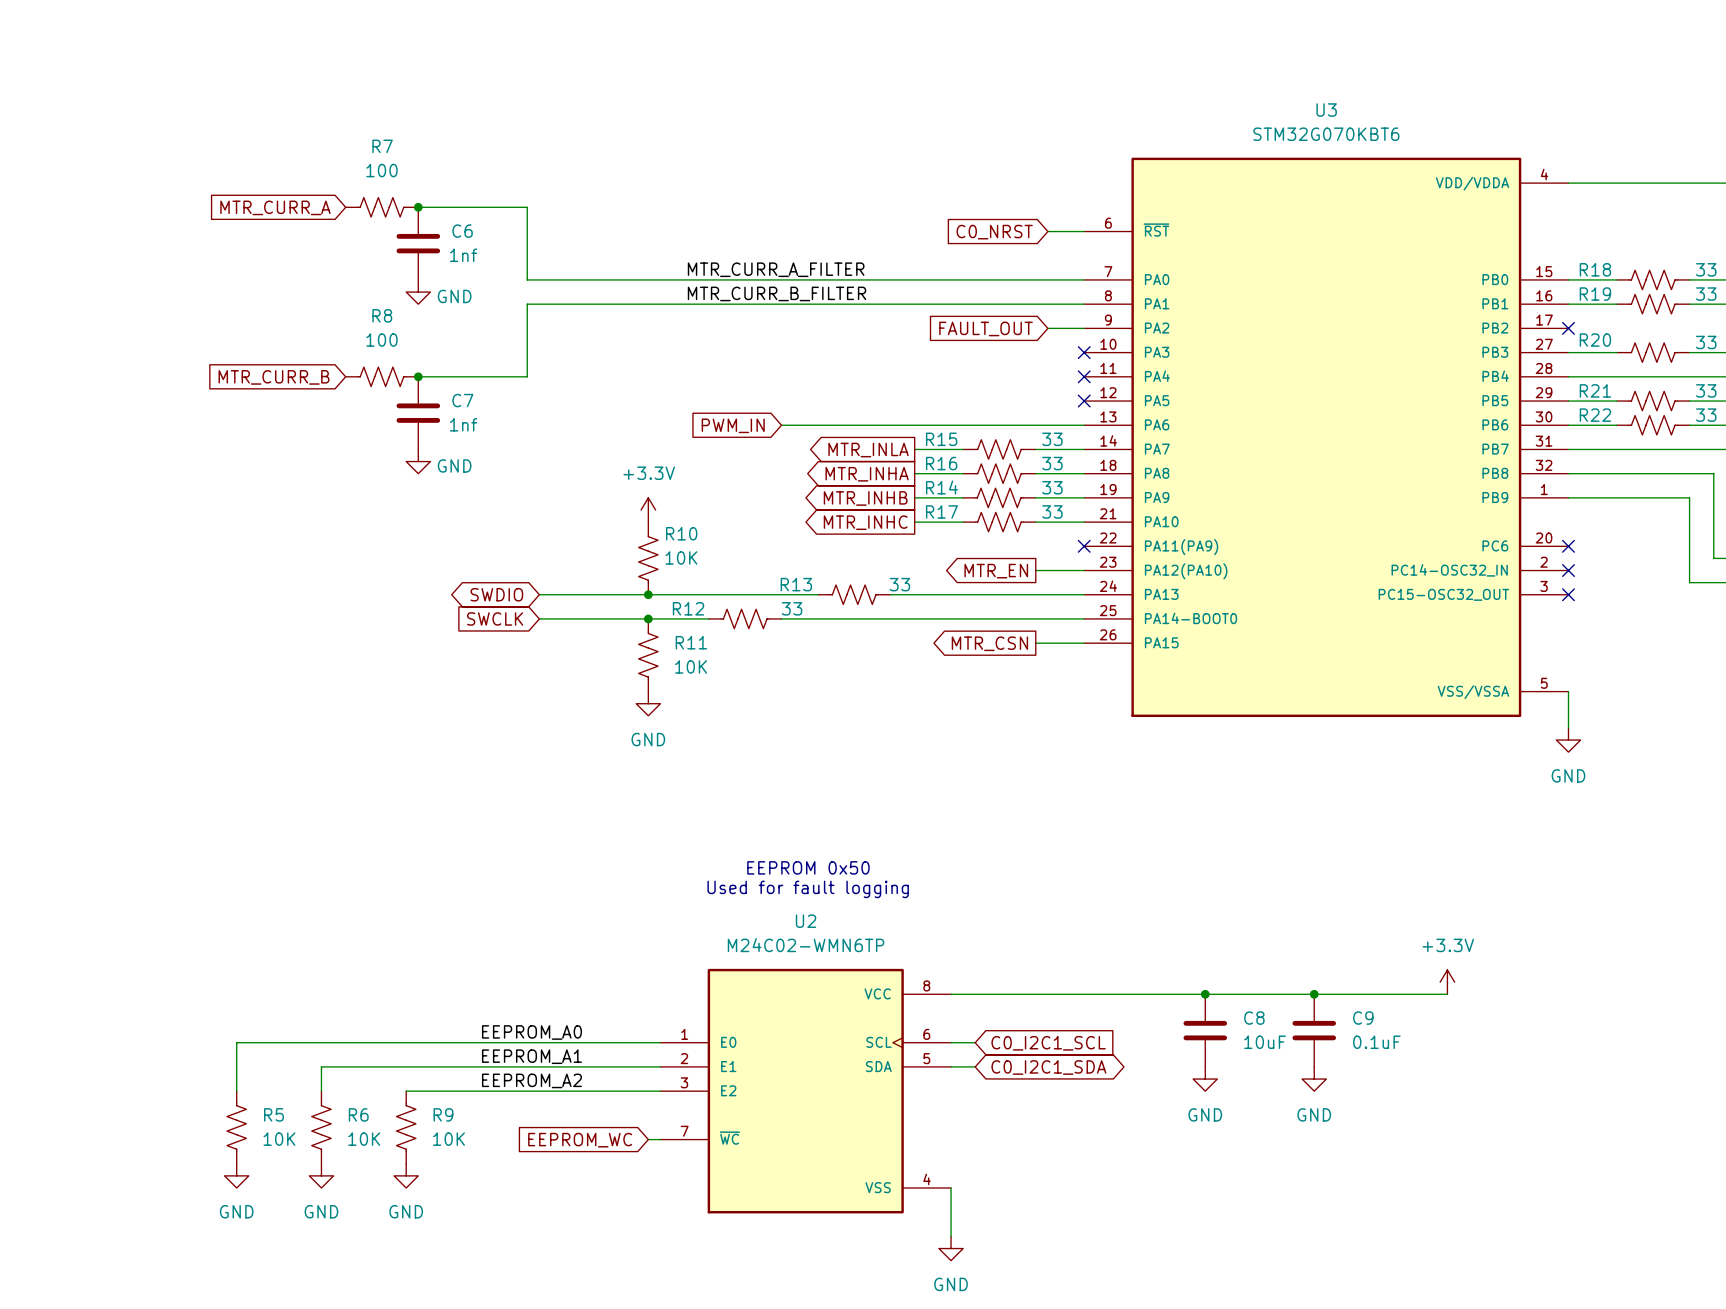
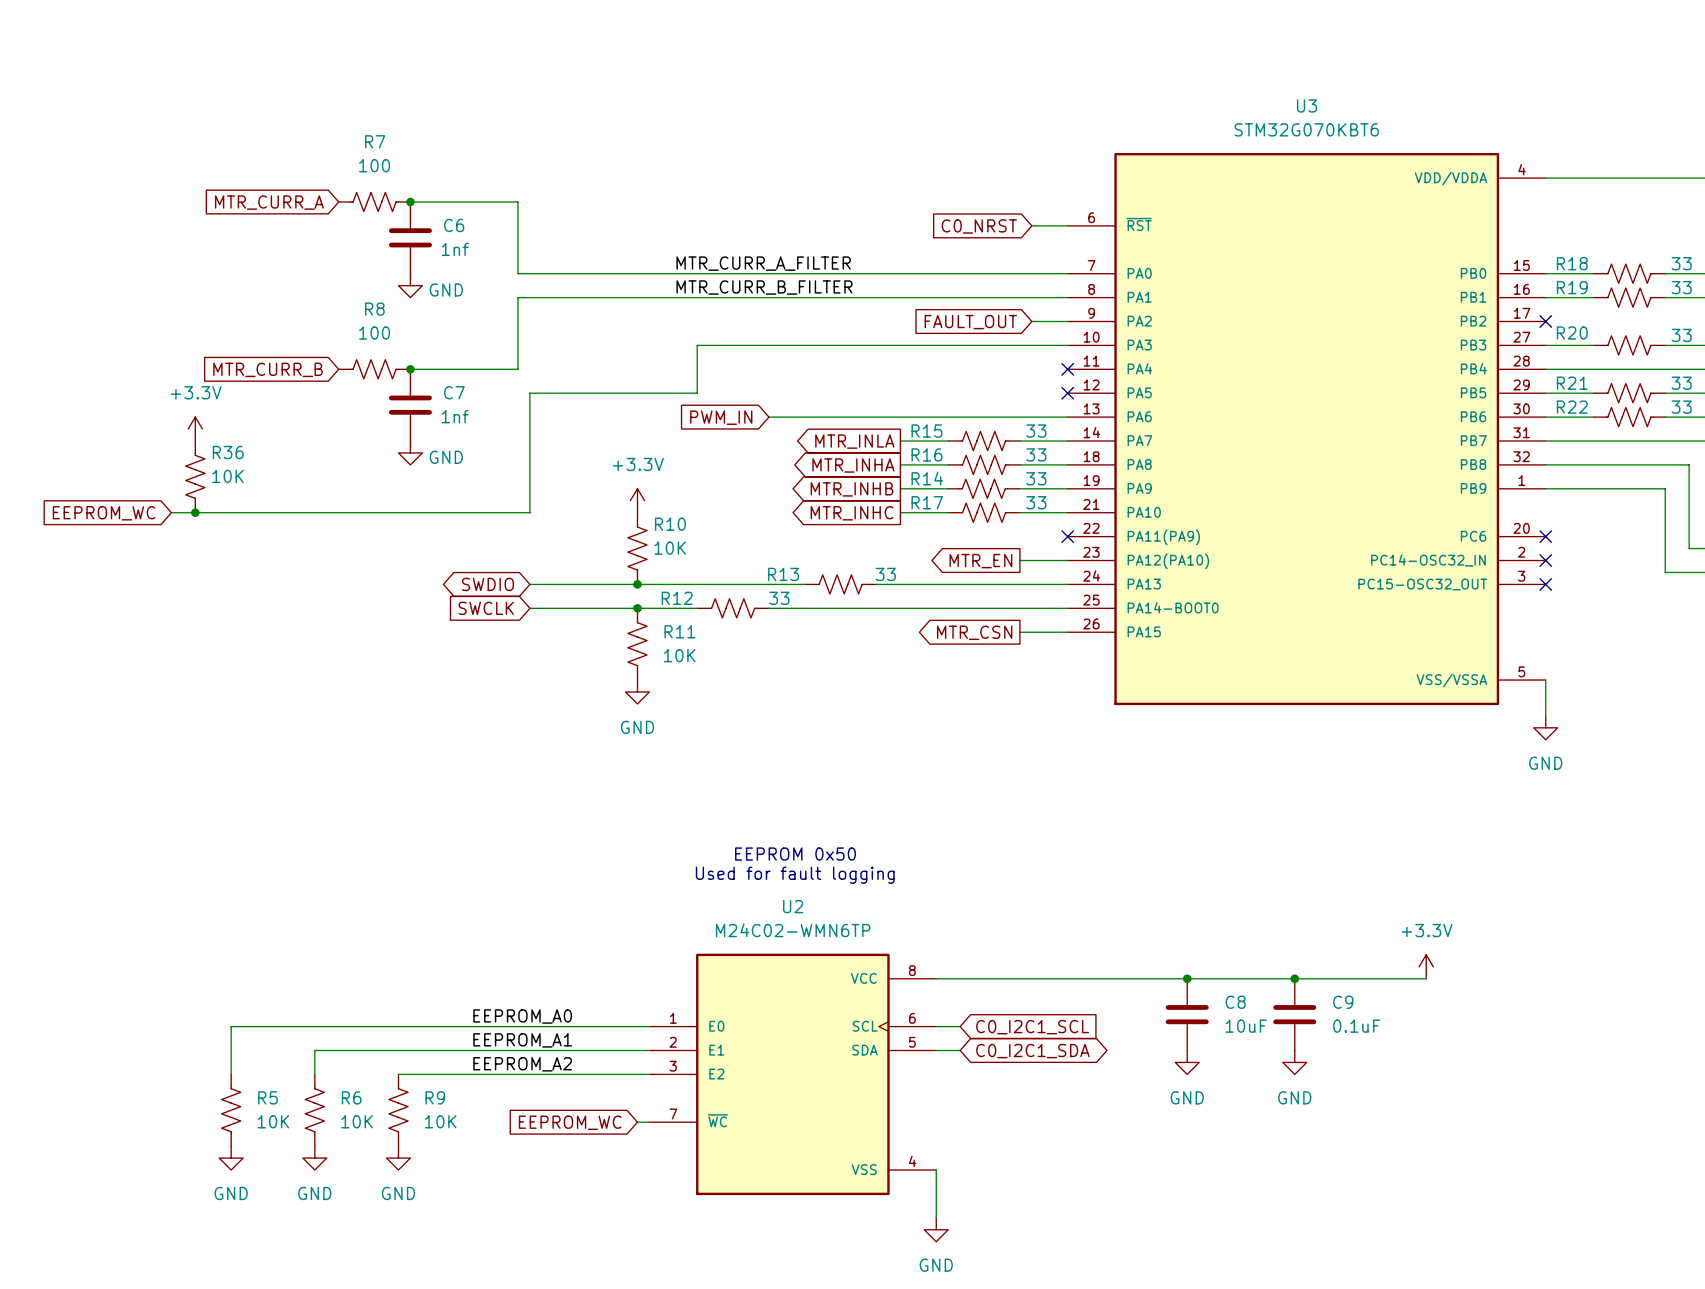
wire: none -> (1067, 345) (697, 345) (697, 393) (529, 393) (529, 512) (171, 512)
no-connect mark: (1084, 352) -> none
power symbol: none -> +3.3V (195, 429)
R36: none -> 10K (195, 476)
global label: none -> EEPROM_WC (104, 513)
junction: none -> (195, 512)

